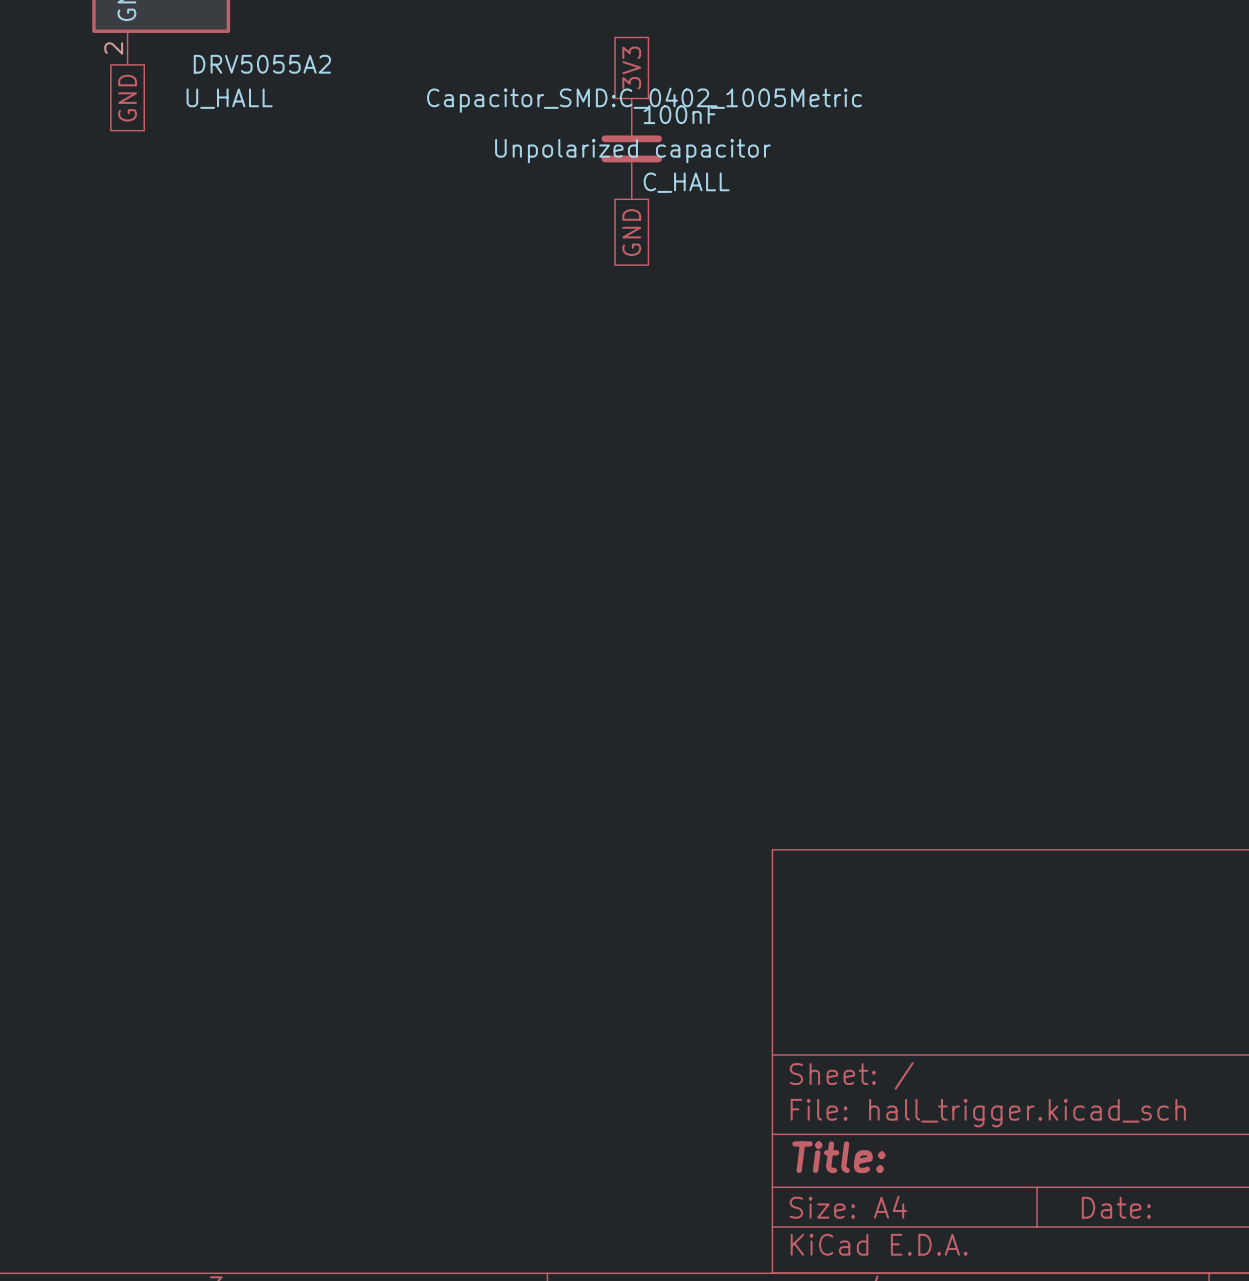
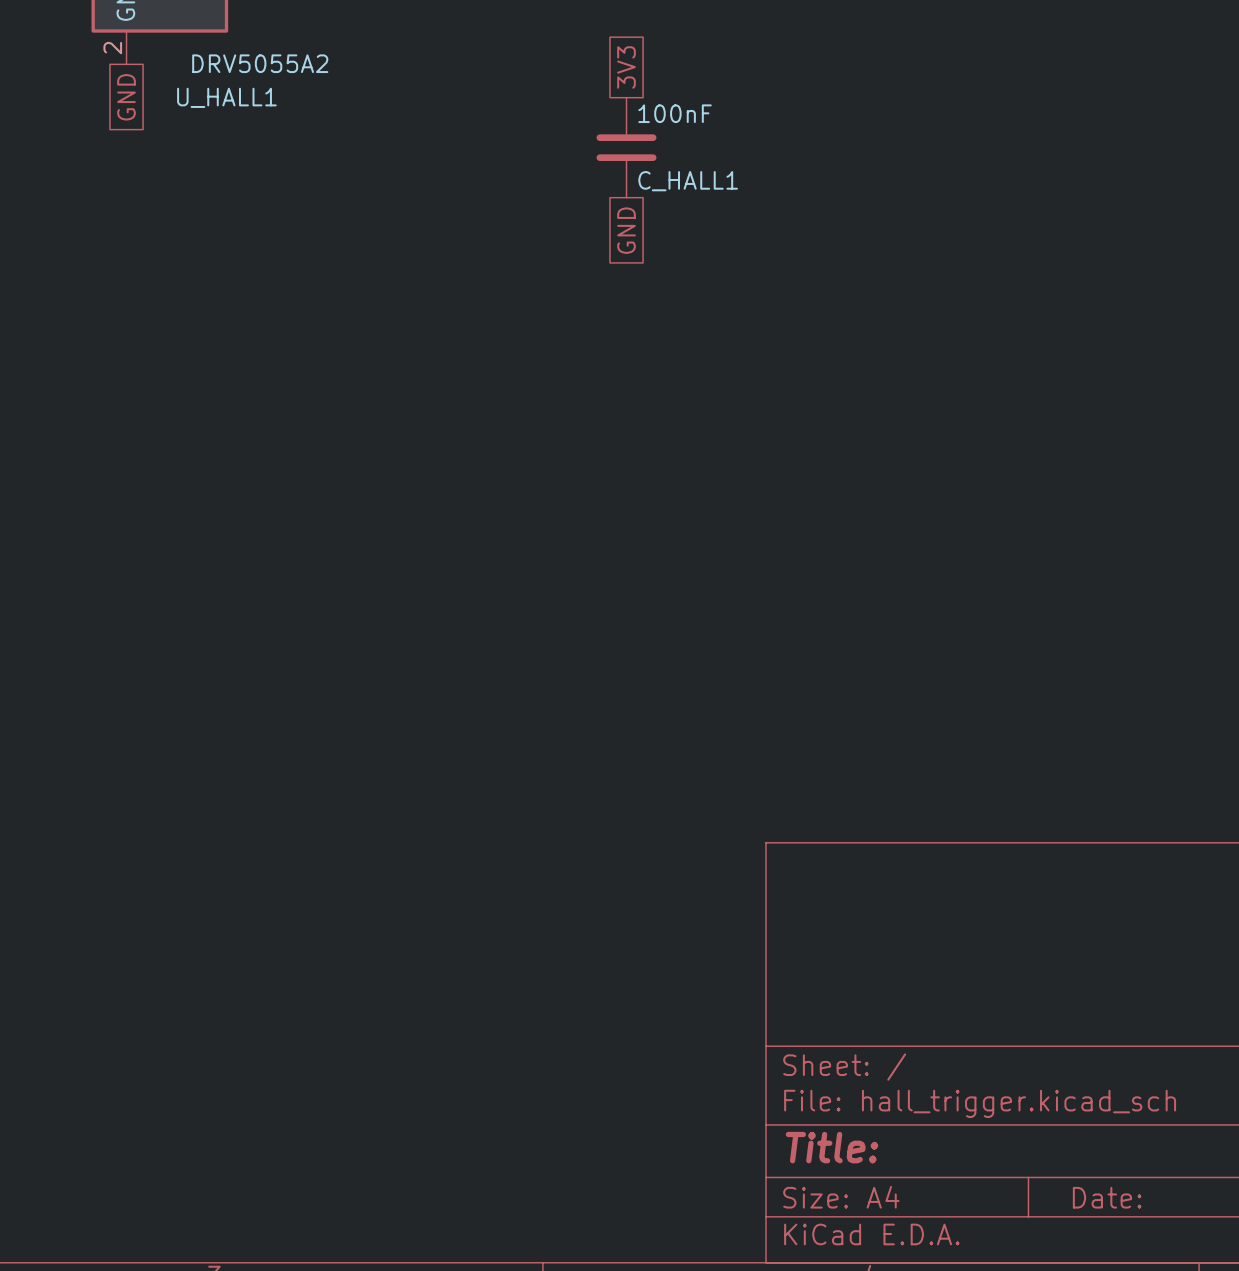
U_HALL name: U_HALL (229, 98) -> U_HALL1 (226, 97)
C_HALL text: Capacitor_SMD:C_0402_1005Metric (644, 100) -> none
C_HALL text: Unpolarized capacitor (632, 151) -> none
C_HALL name: C_HALL (686, 182) -> C_HALL1 (688, 181)

